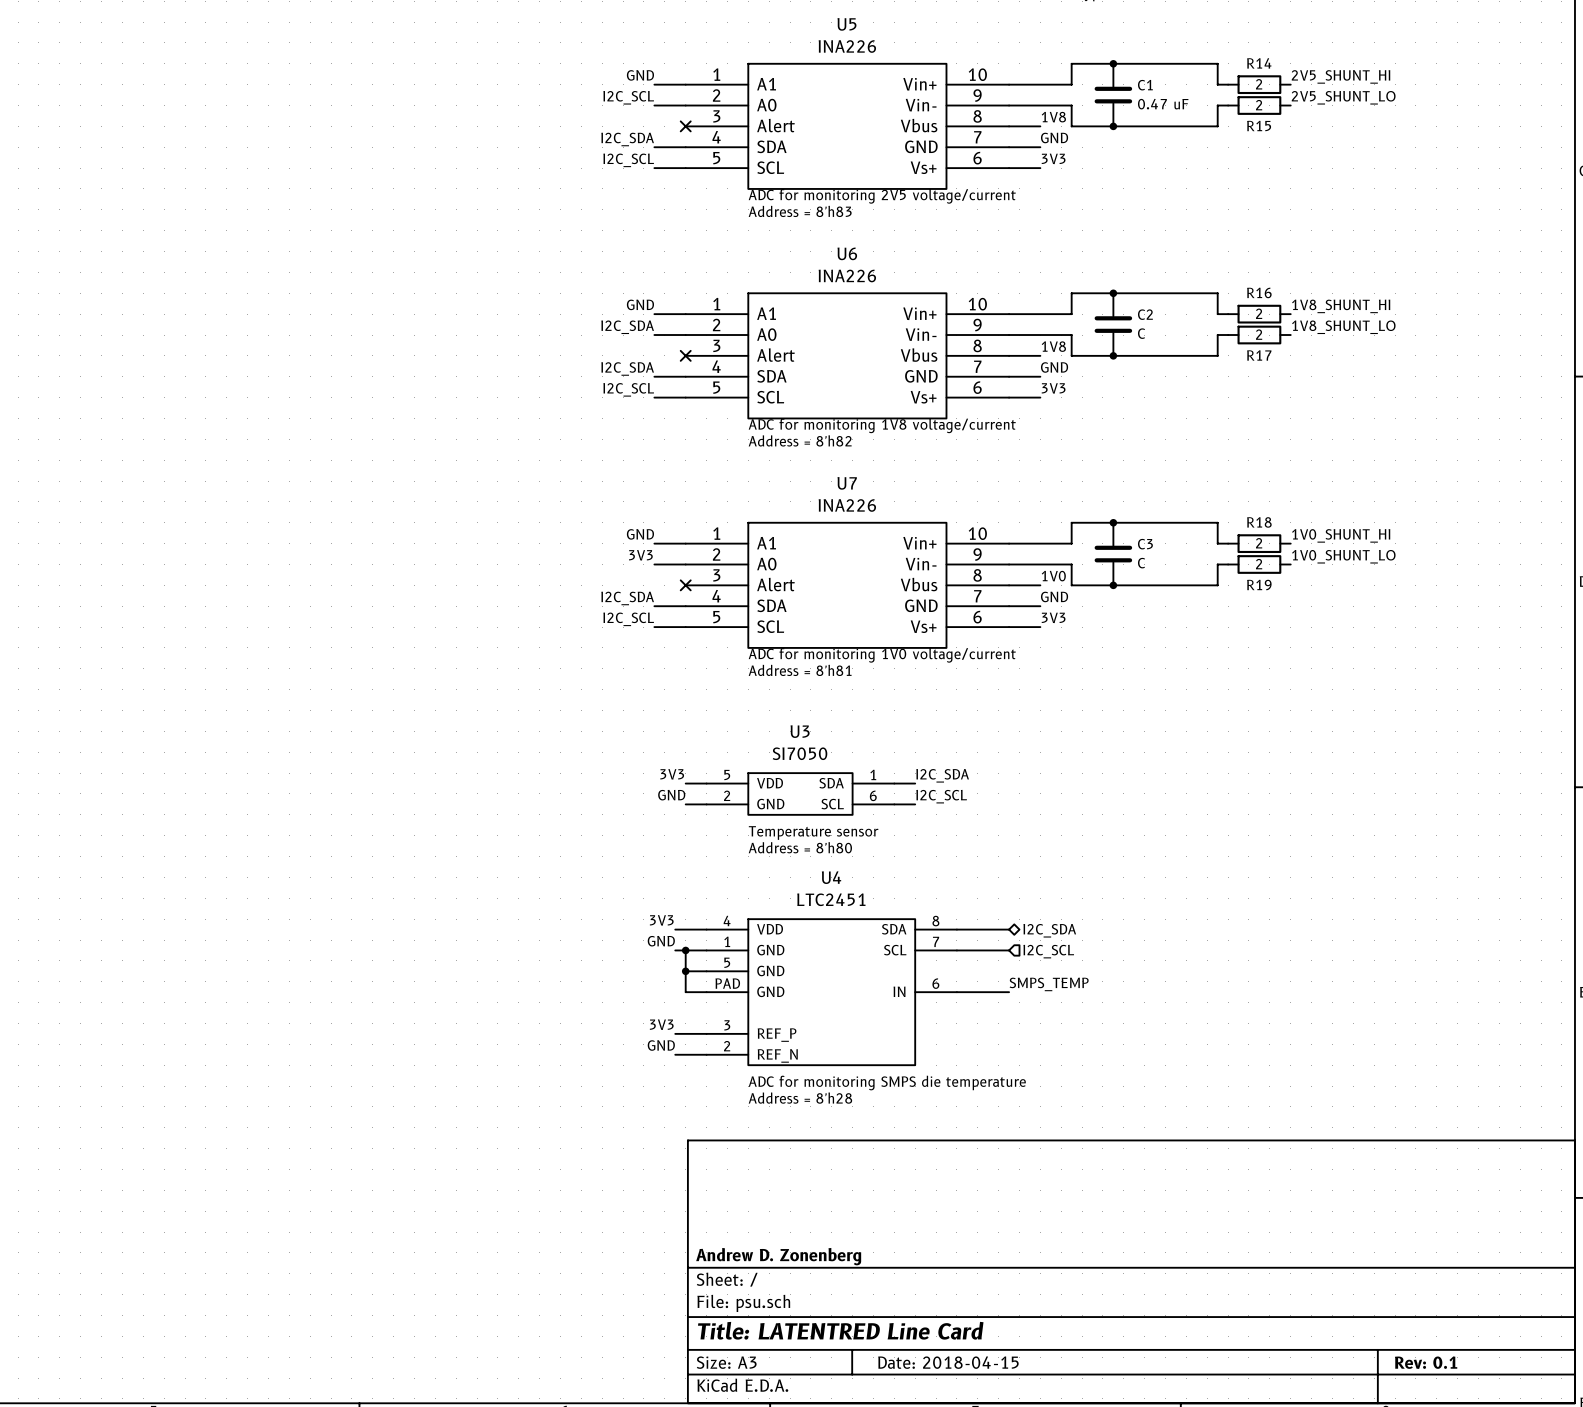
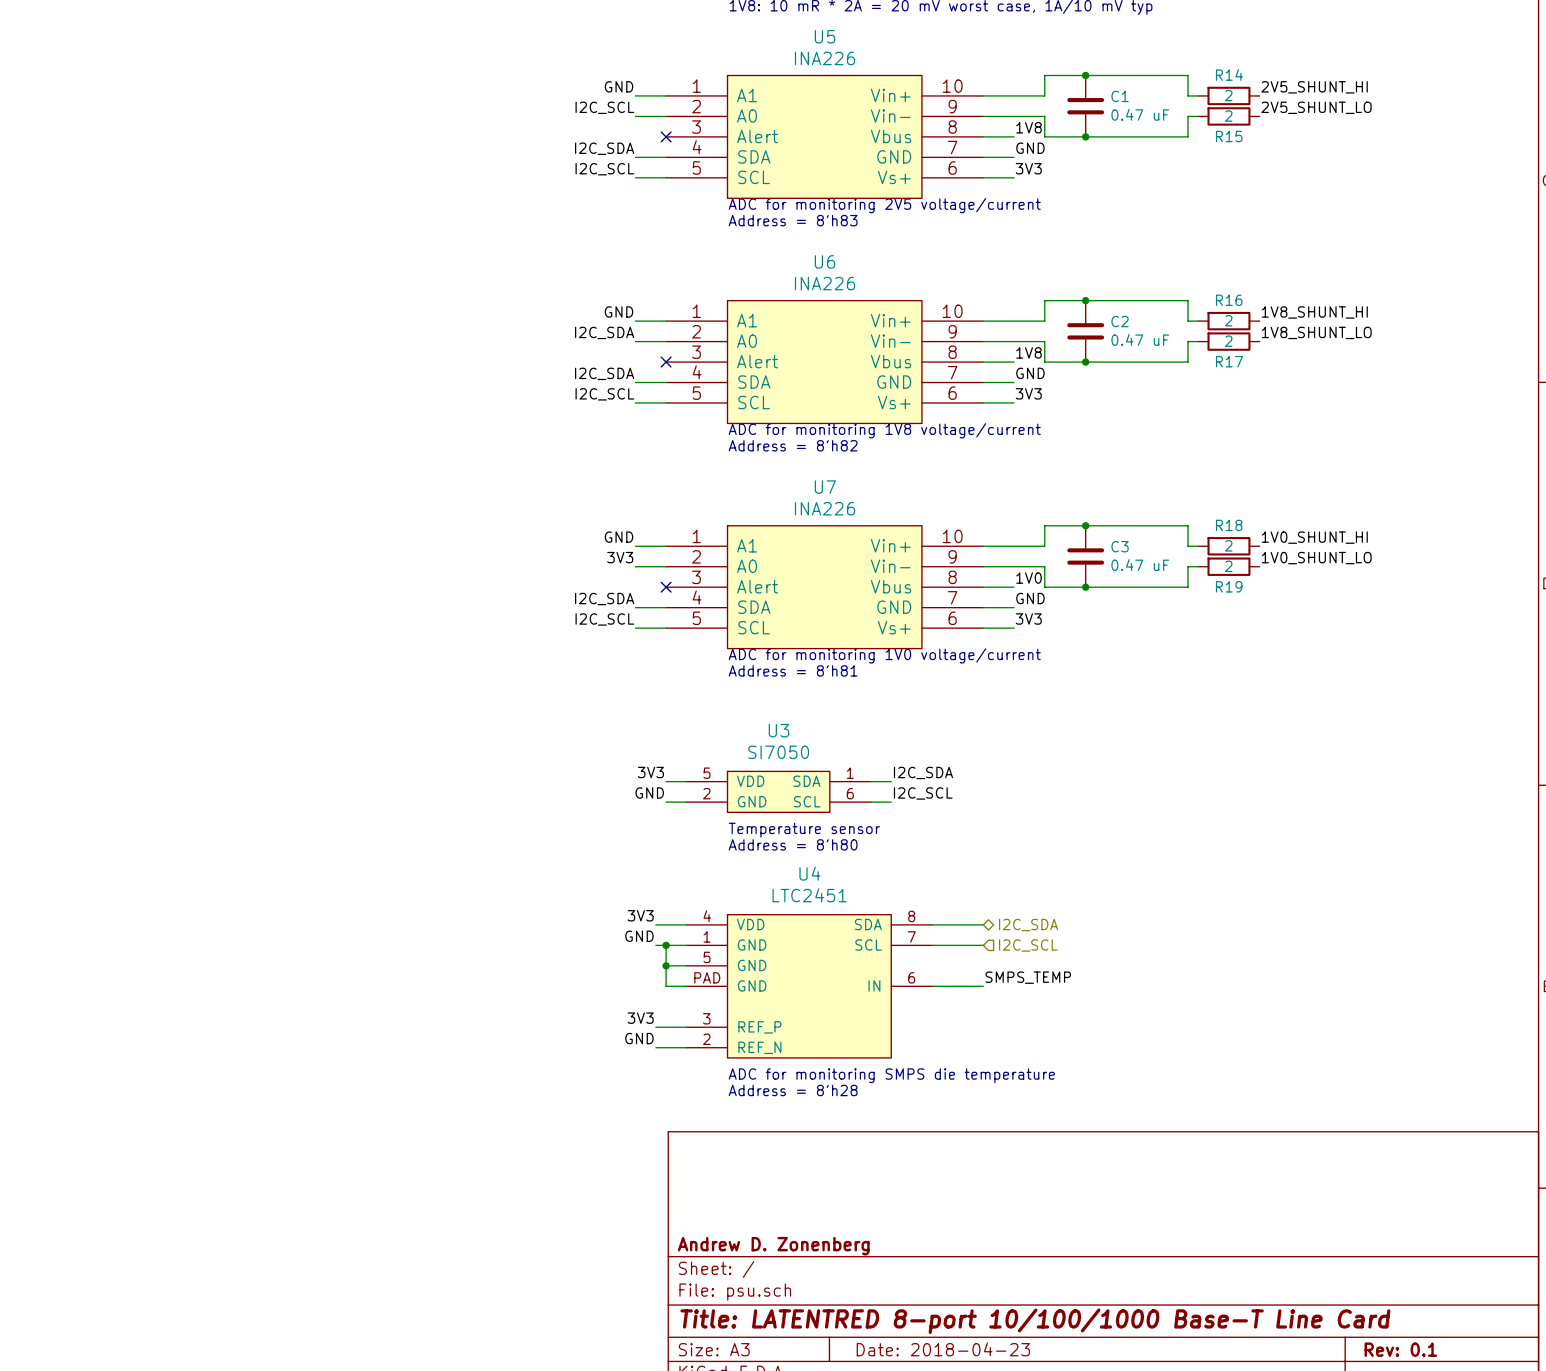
C2 value: C (1141, 333) -> 0.47 uF (1140, 339)
C3 value: C (1141, 563) -> 0.47 uF (1140, 565)
title block: Title: LATENTRED Line Card (840, 1330) -> Title: LATENTRED 8-port 10/100/1000 Base-T Line Card (1035, 1321)
title block: Date: 2018-04-15 (948, 1362) -> Date: 2018-04-23 (943, 1349)

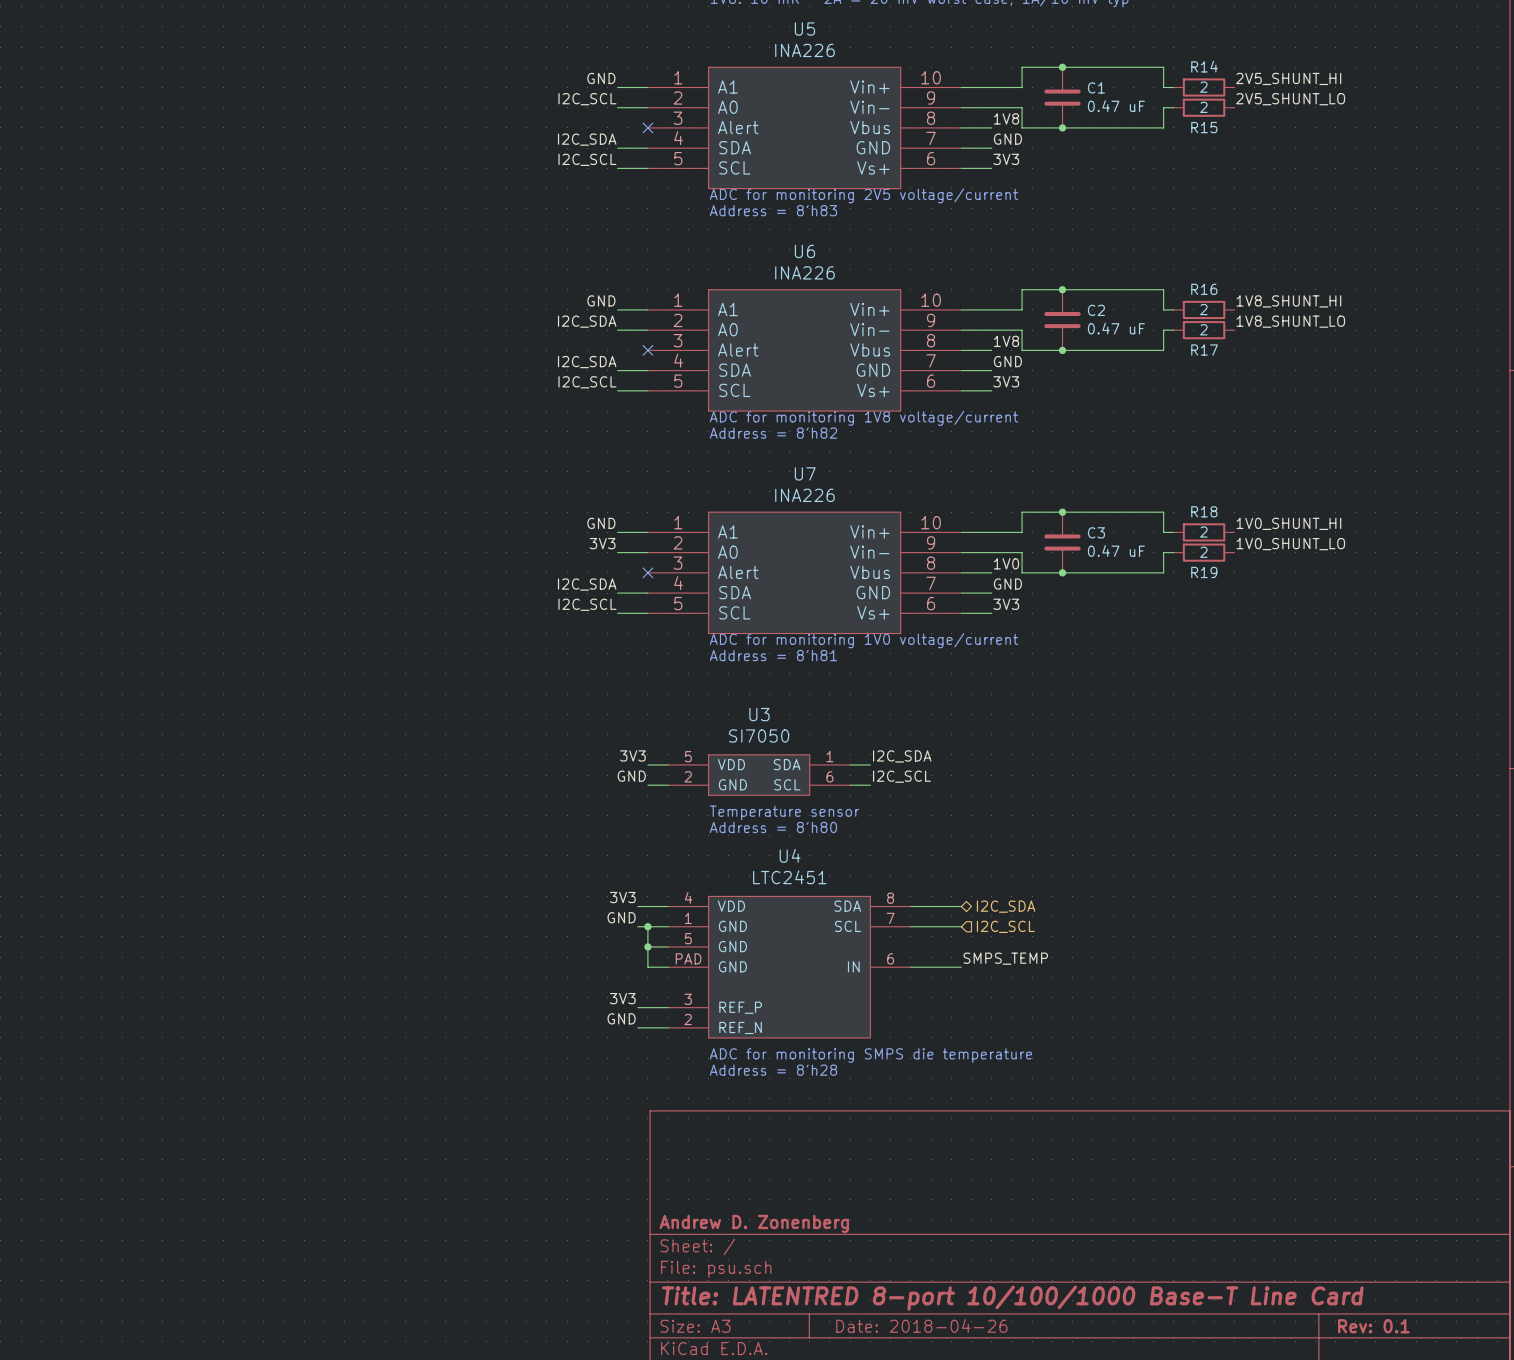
title block: Date: 2018-04-23 (943, 1349) -> Date: 2018-04-26 (921, 1325)

